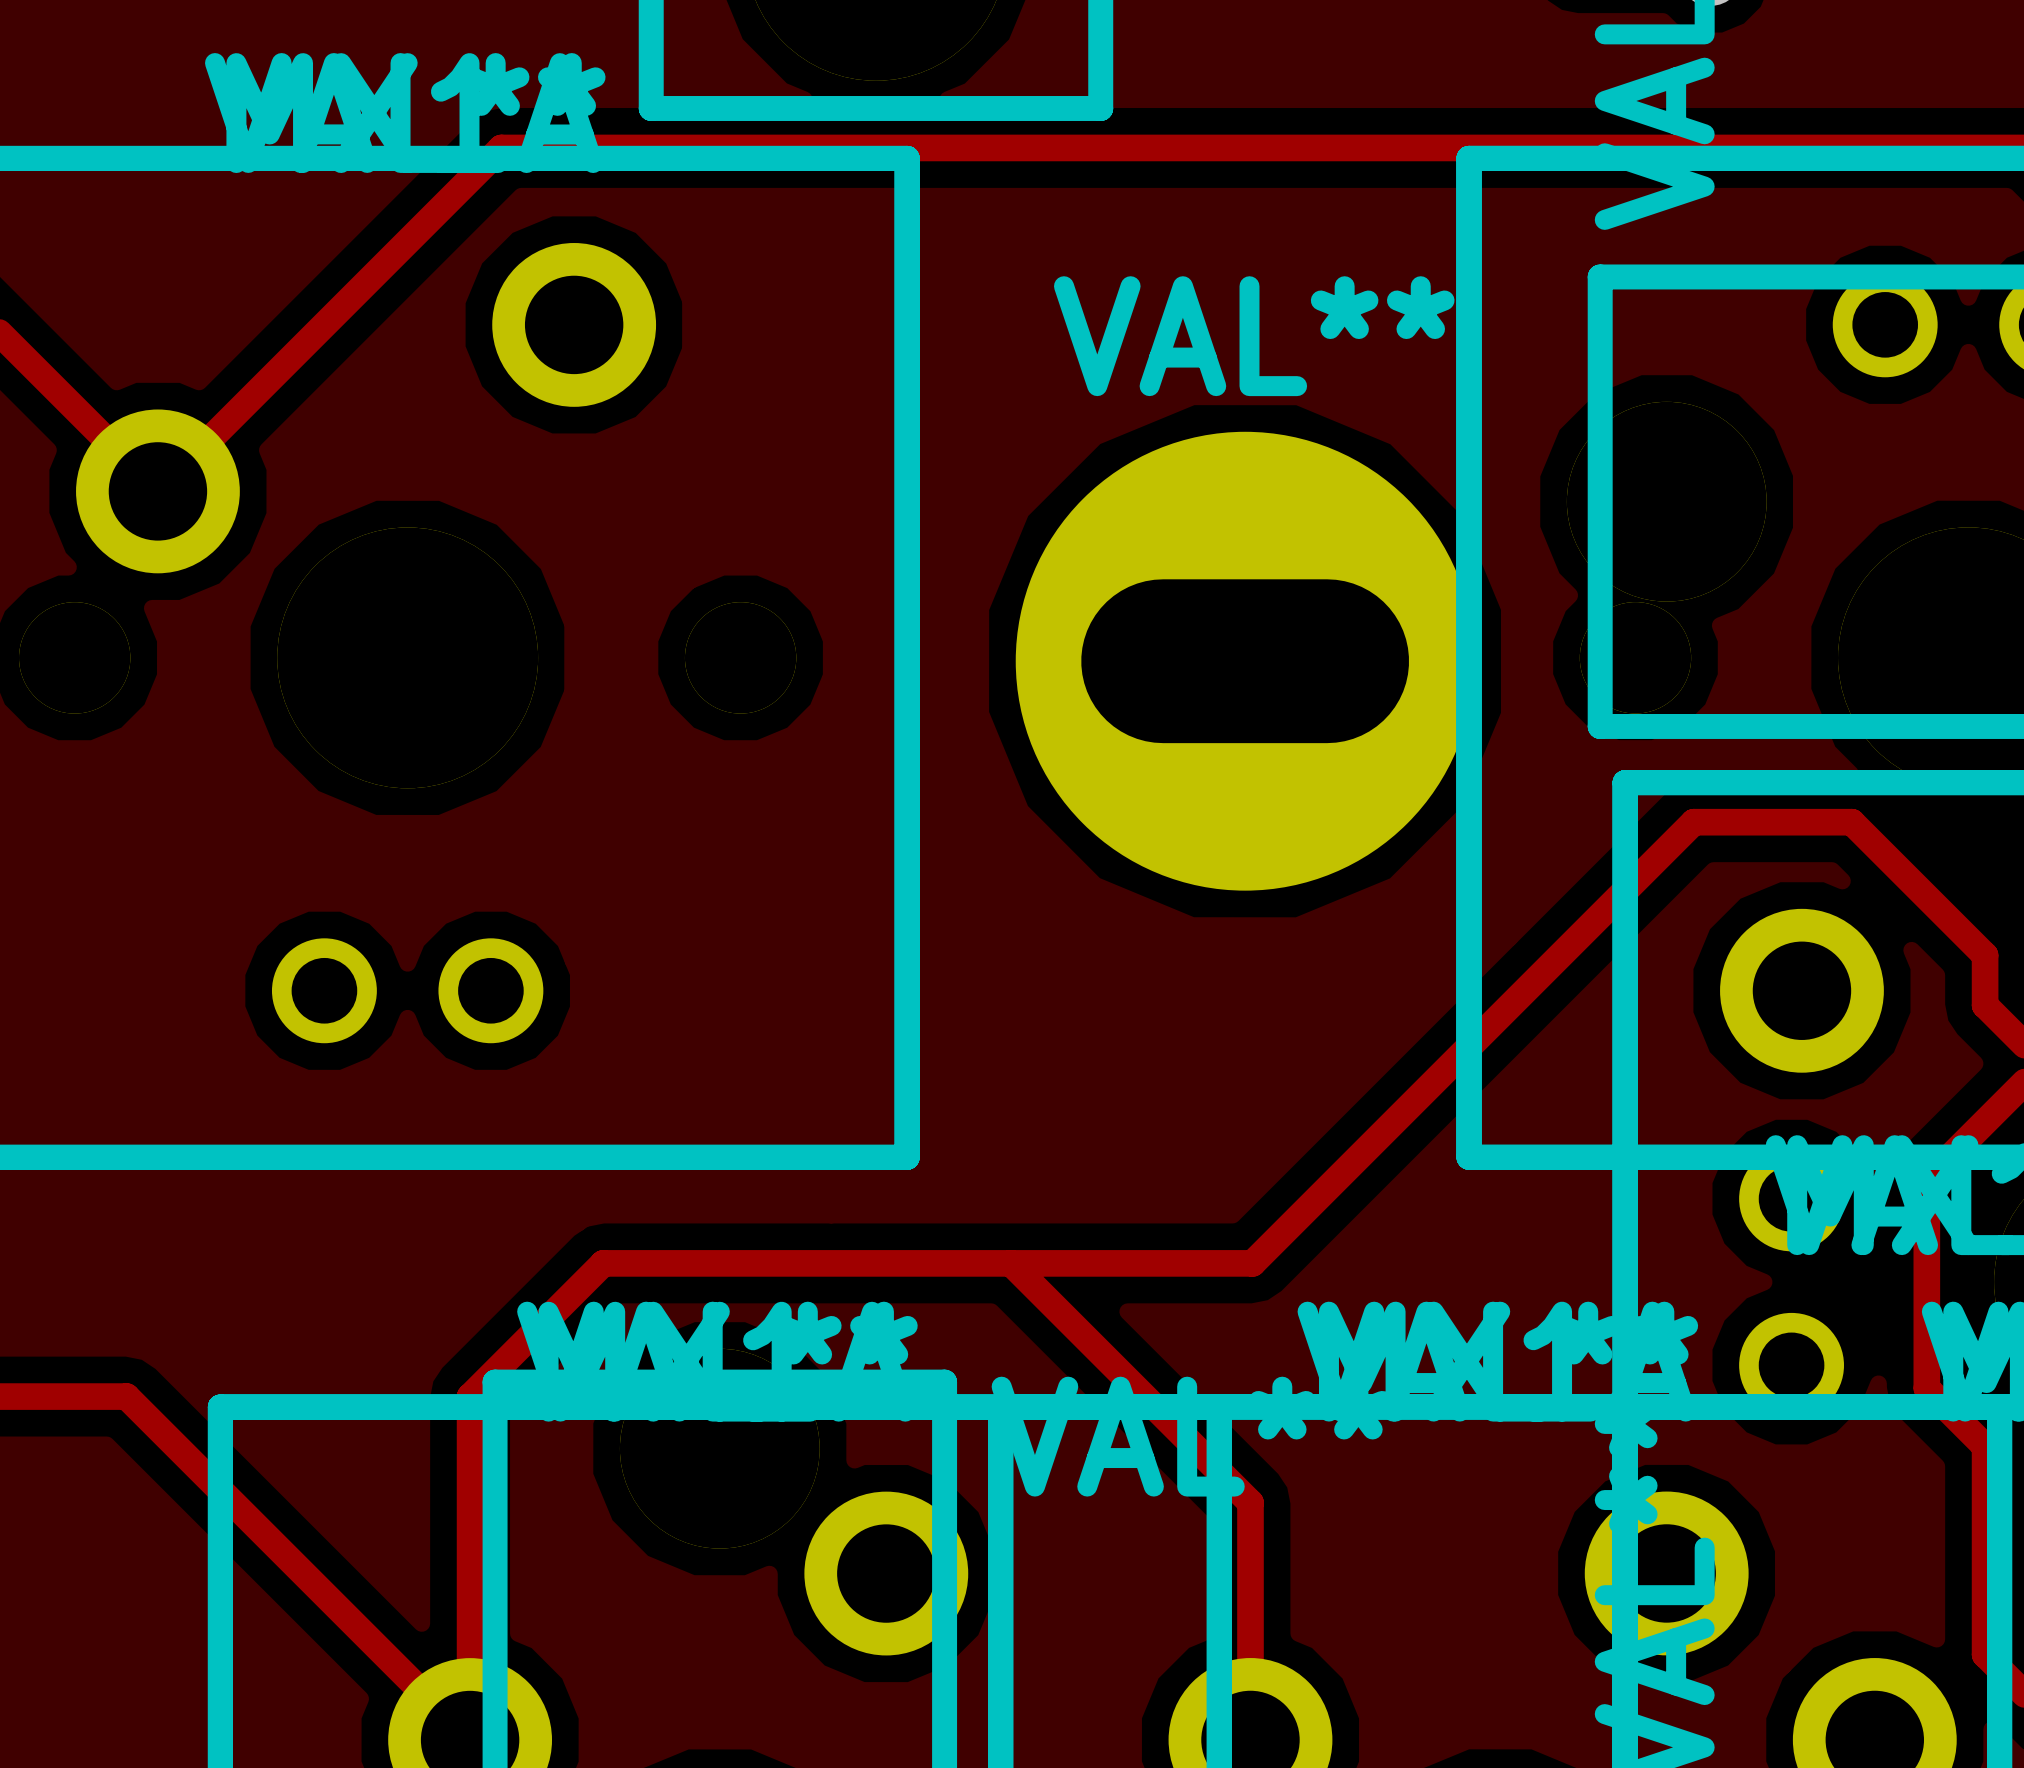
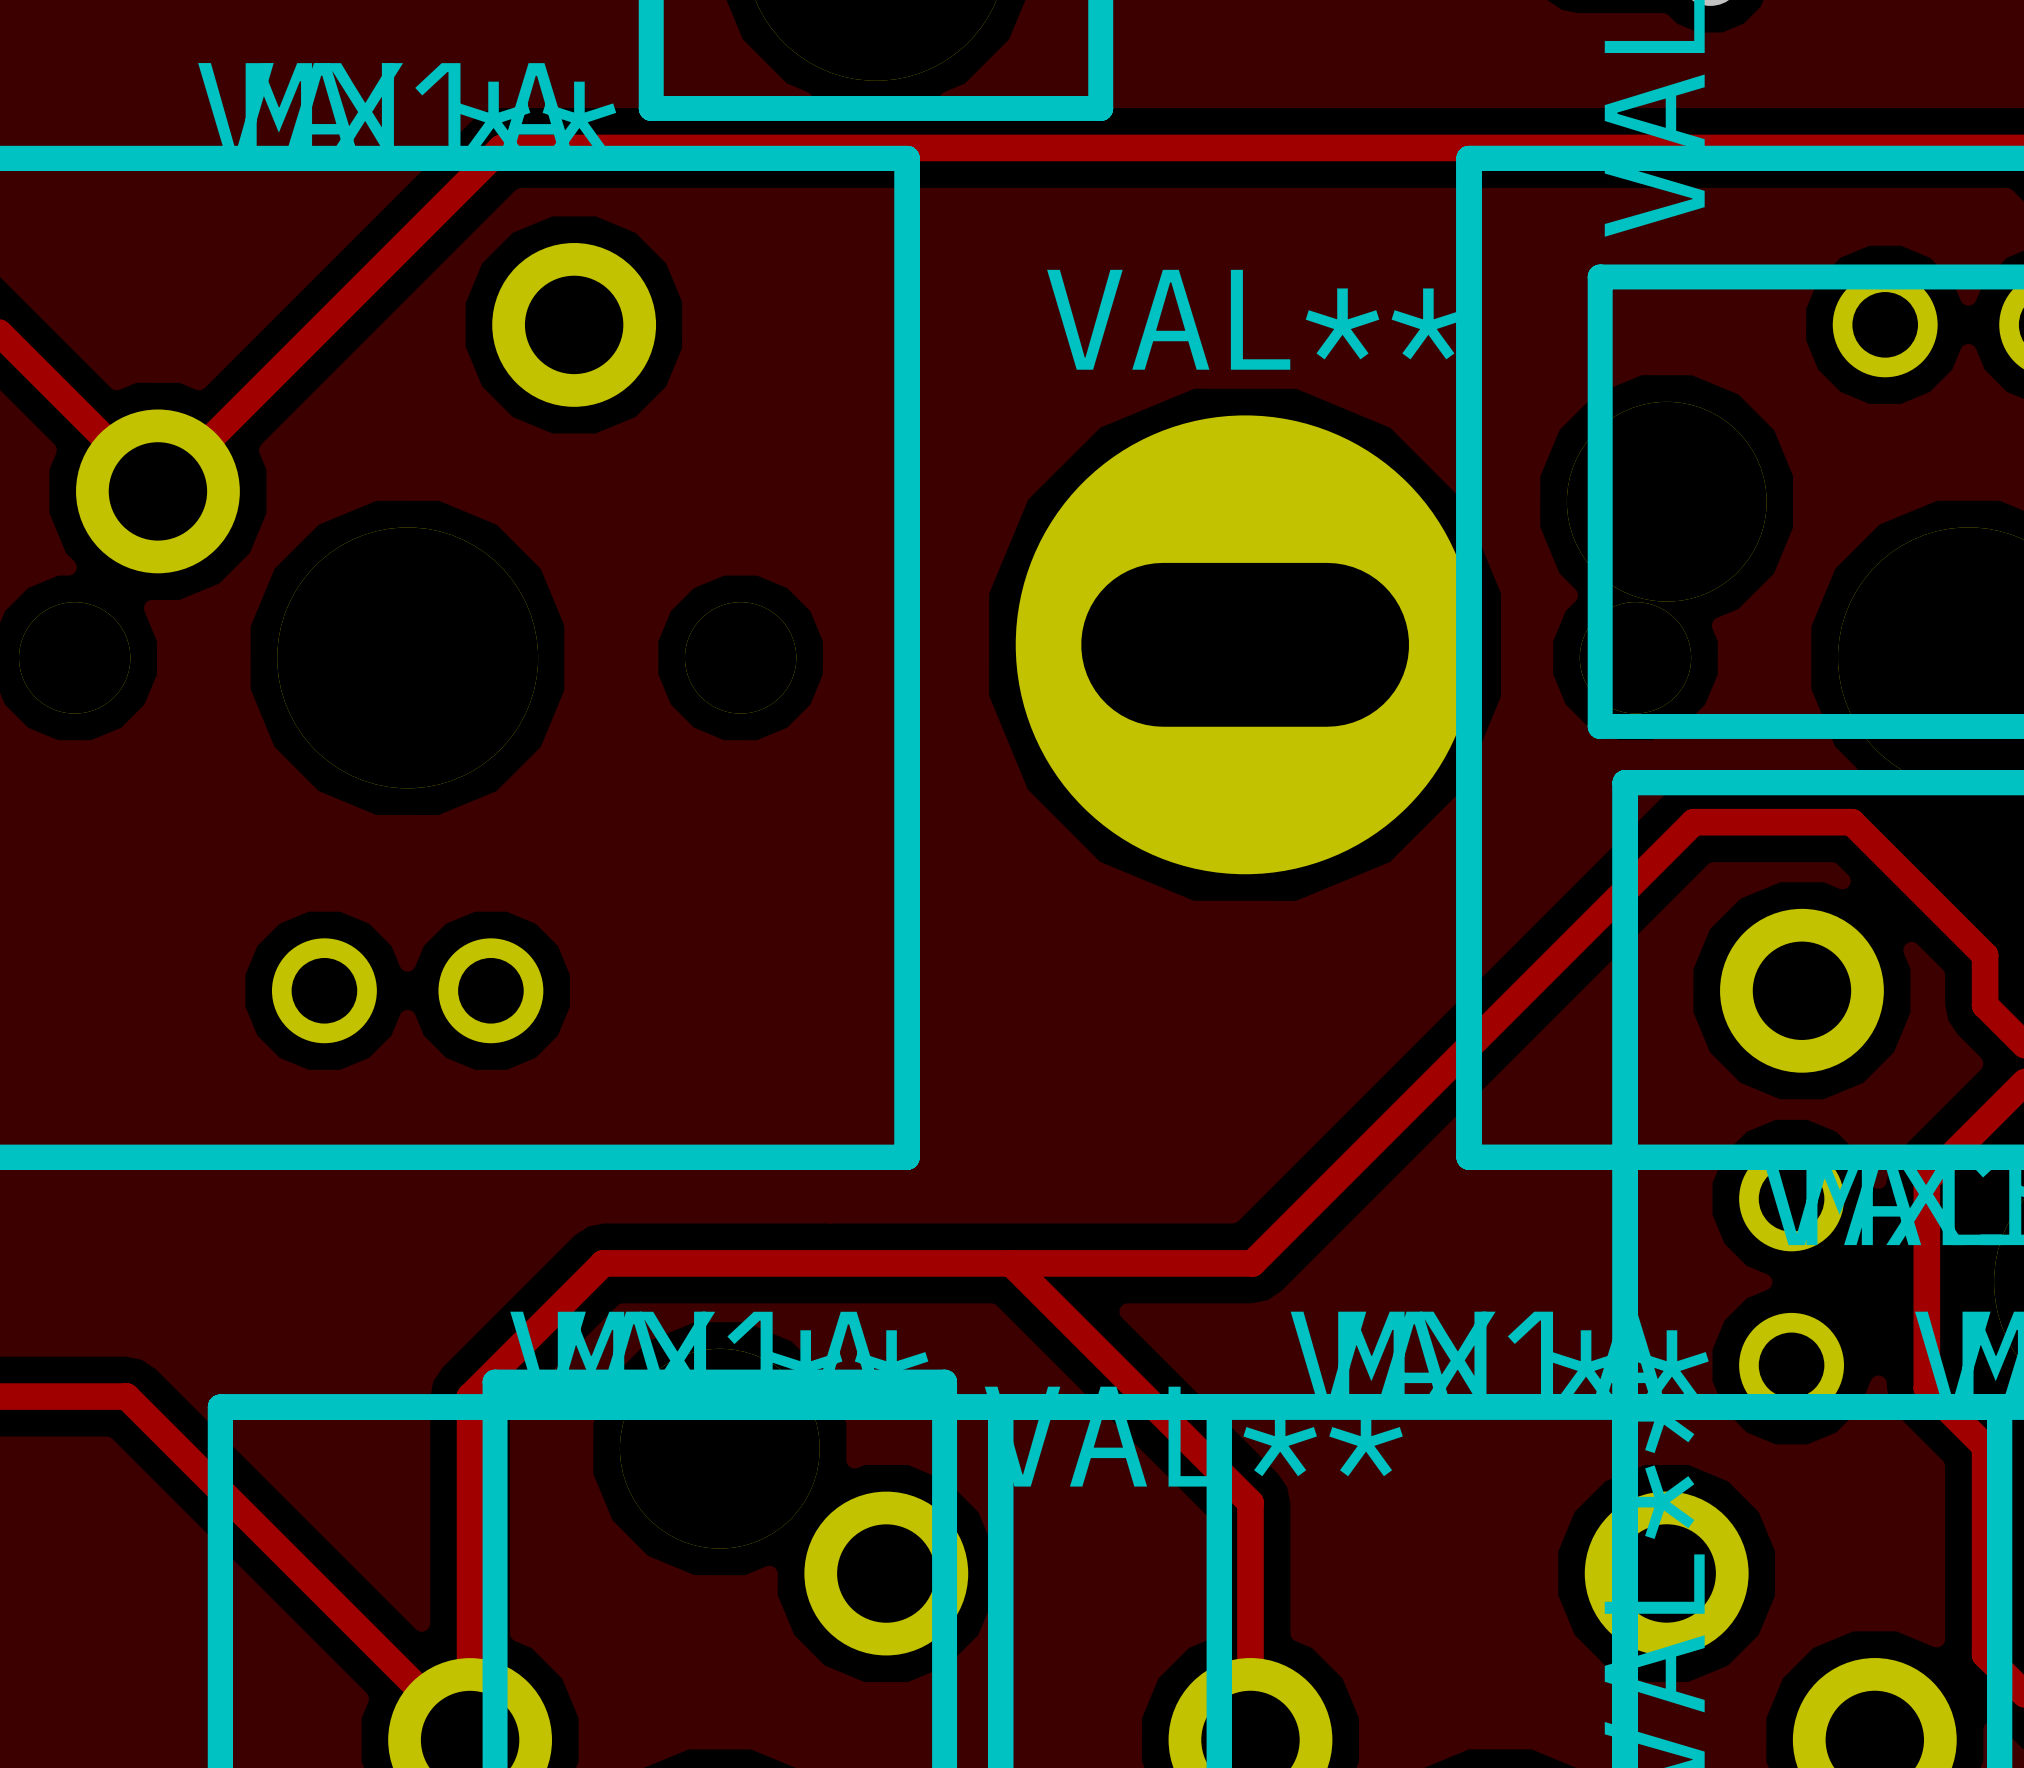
part position: (1245, 661) -> (1245, 644)

